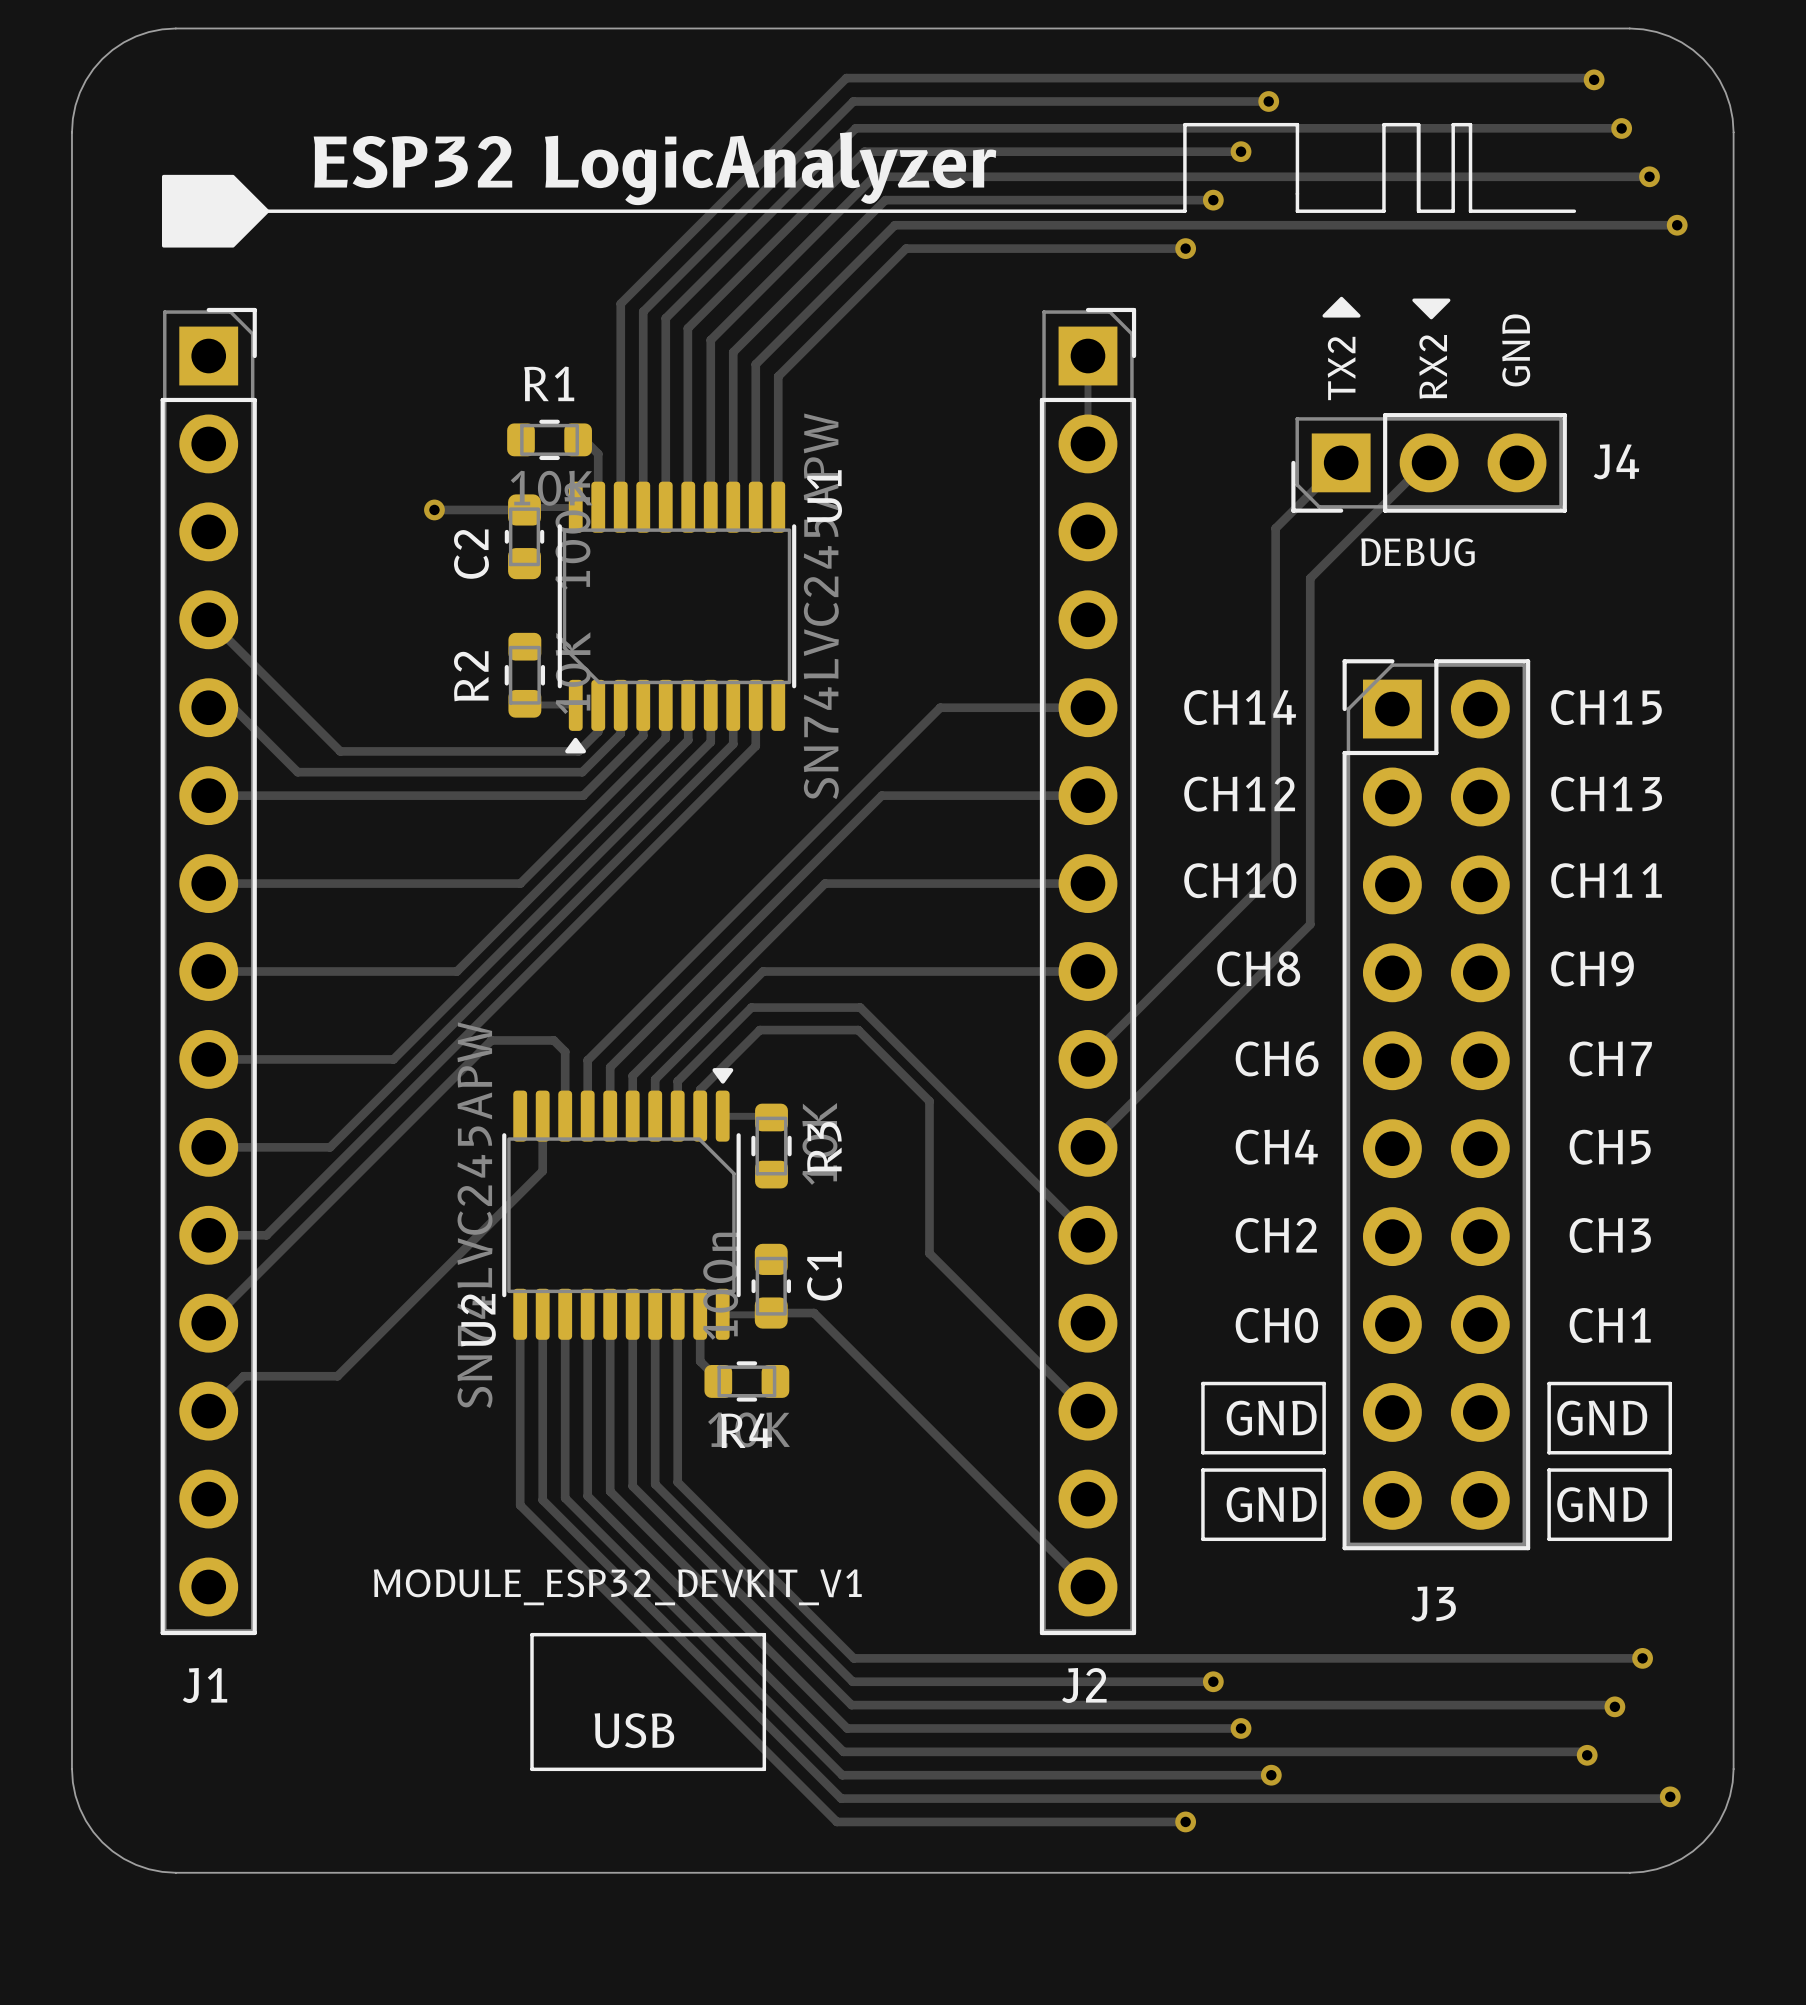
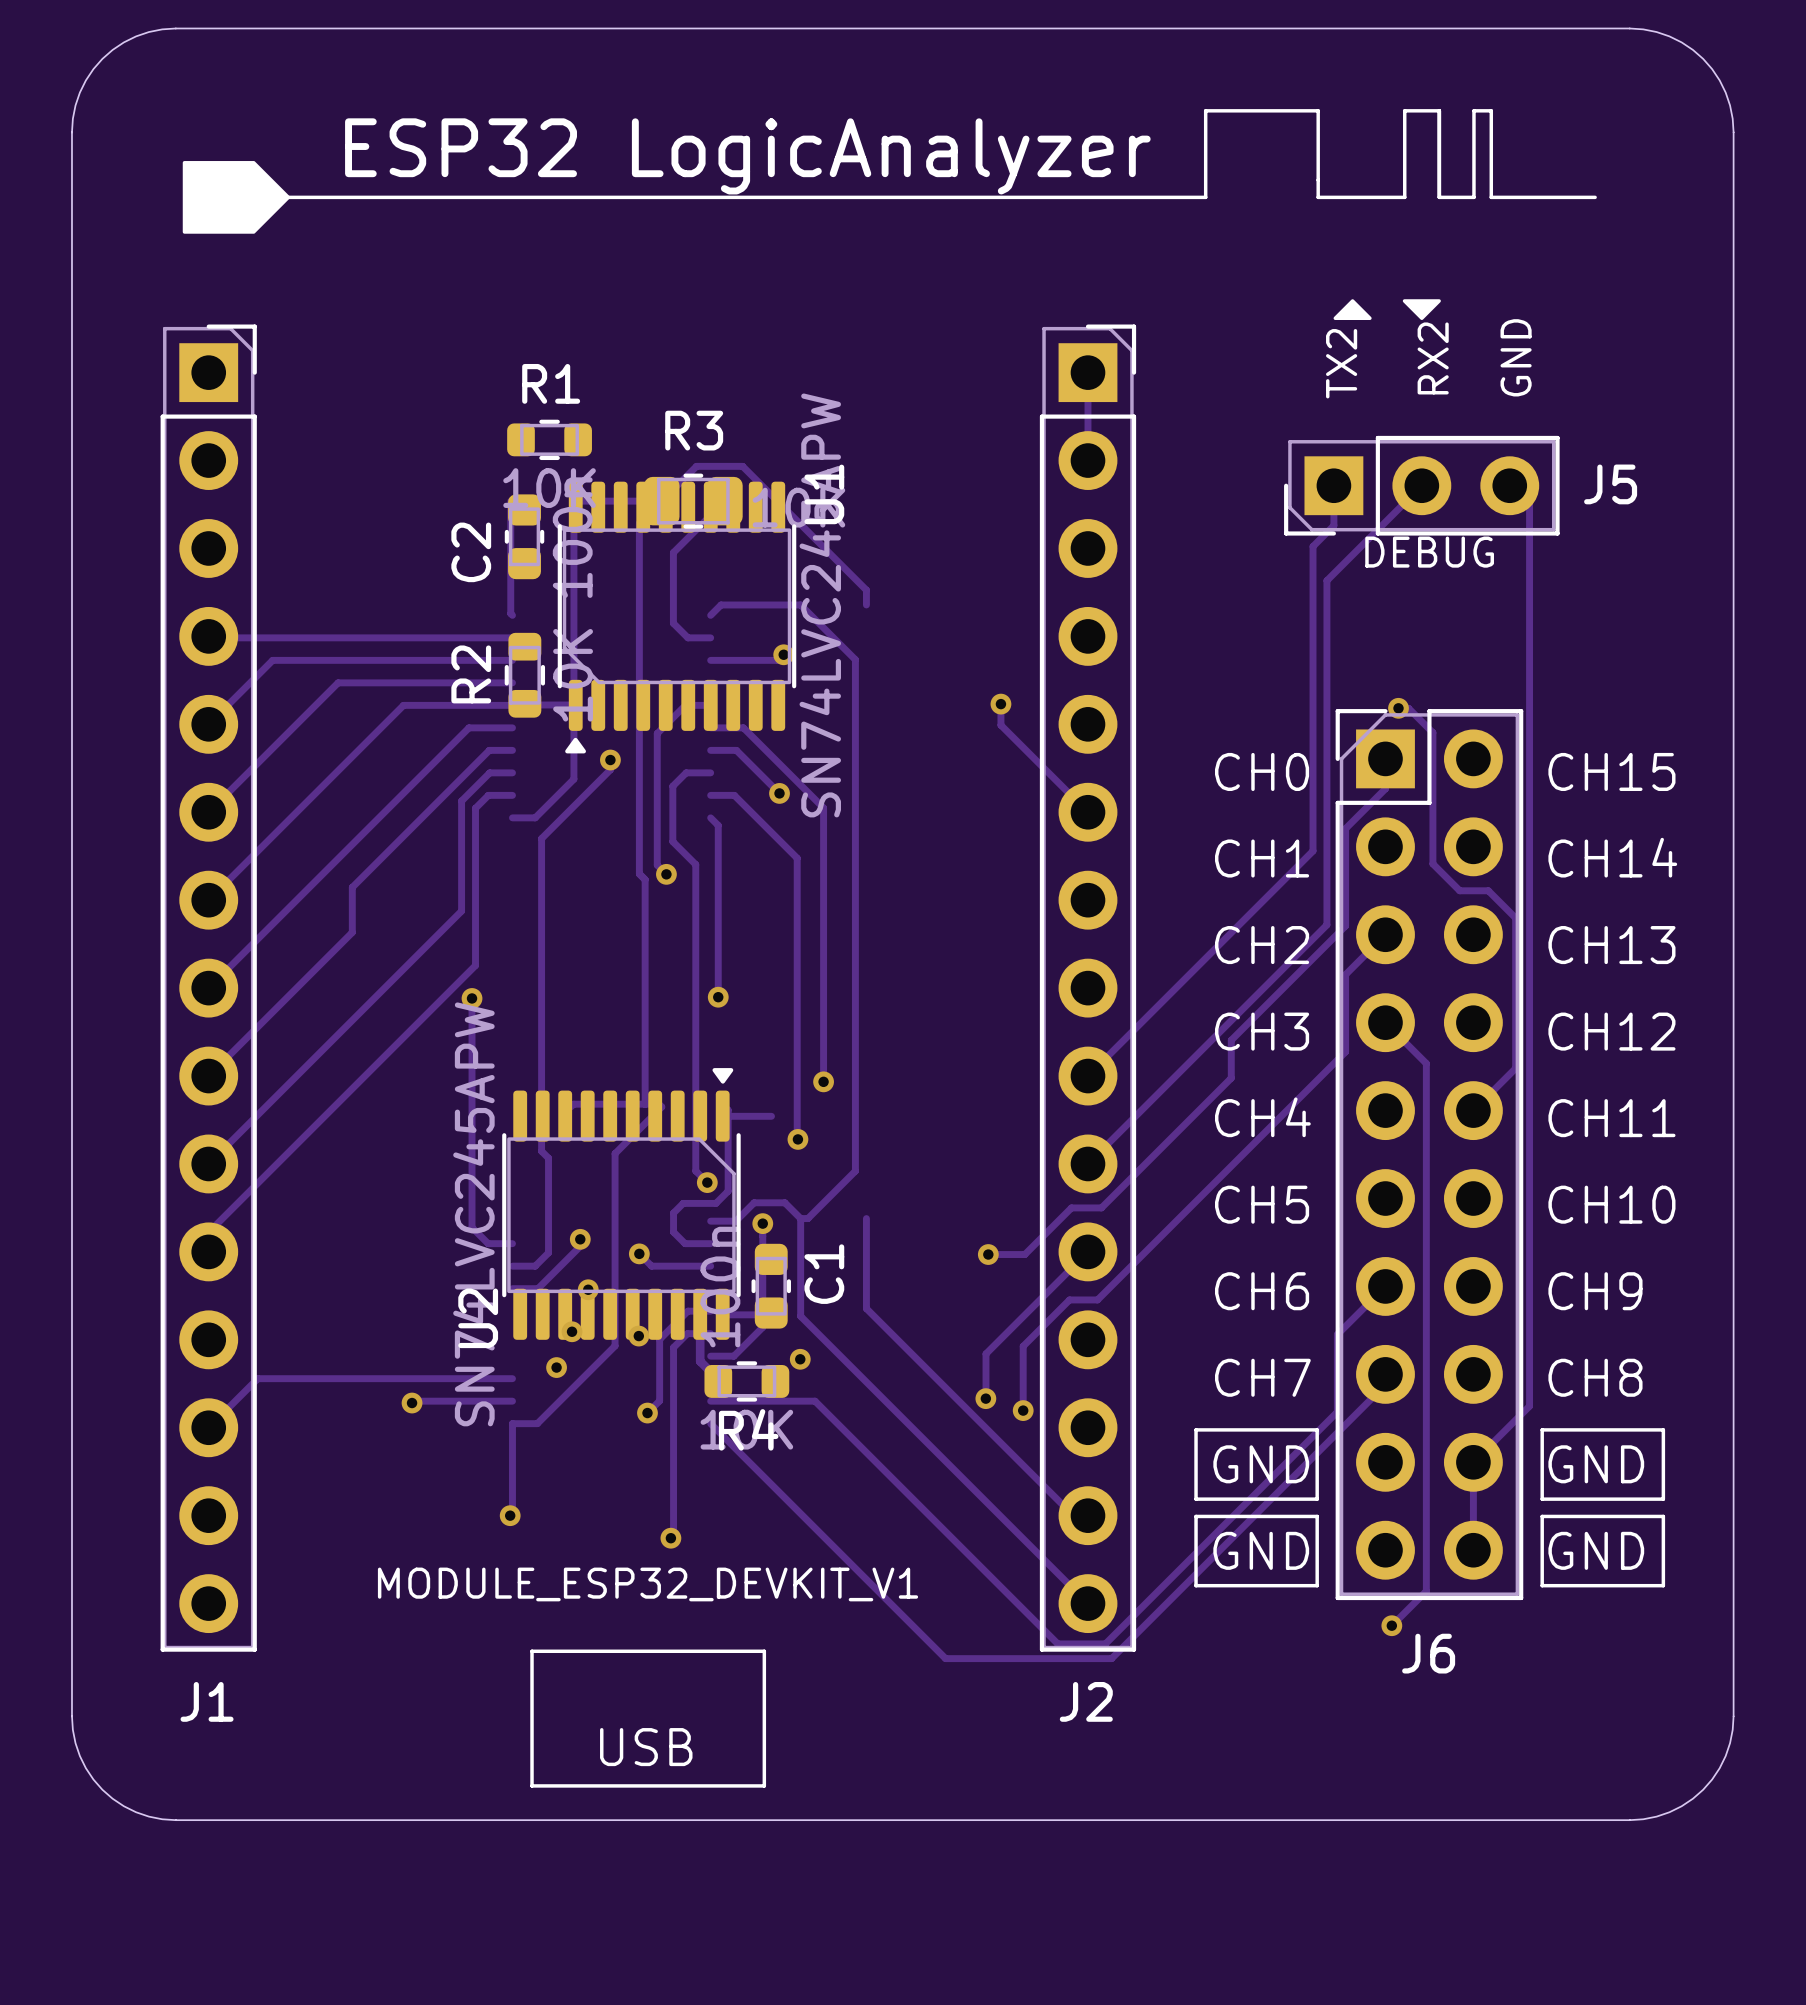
track: (1594, 79) (1592, 78) (846, 78) (620, 303) (620, 507) -> none
via: (1594, 79) -> none
track: (1268, 101) (853, 101) (643, 311) (643, 507) -> none
via: (1268, 101) -> none
track: (1621, 128) (855, 128) (665, 318) (665, 507) -> none
via: (1621, 128) -> none
via: (1241, 151) -> none
track: (1241, 156) (1241, 151) (864, 151) (687, 328) (687, 506) -> none
text position: ESP32 LogicAnalyzer (654, 168) -> ESP32 LogicAnalyzer (747, 156)
track: (1649, 176) (874, 176) (710, 340) (710, 507) -> none
via: (1649, 176) -> none
track: (1212, 200) (885, 200) (733, 352) (733, 507) -> none
via: (1213, 200) -> none
drawing position: (215, 211) -> (236, 197)
line: (267, 211) (1184, 211) (1184, 124) (1297, 124) (1297, 211) (1383, 211) (1383, 124) (1418, 124) (1418, 211) (1453, 211) (1453, 124) (1470, 124) (1470, 211) (1574, 211) -> (288, 197) (1205, 197) (1205, 110) (1318, 110) (1318, 197) (1404, 197) (1404, 110) (1439, 110) (1439, 197) (1473, 197) (1473, 110) (1491, 110) (1491, 197) (1595, 197)
track: (1677, 225) (894, 225) (755, 364) (755, 507) -> none
via: (1677, 225) -> none
track: (1183, 246) (1185, 248) (906, 248) (778, 376) (778, 507) -> none
via: (1185, 248) -> none
drawing shape: [1322, 296, 1361, 318] -> [1333, 299, 1372, 321]
drawing shape: [1412, 298, 1451, 320] -> [1402, 299, 1441, 321]
track: (584, 439) (598, 453) (598, 507) -> none
J4 name: J4 (1616, 461) -> J5 (1610, 484)
track: (1341, 462) (1275, 528) (1275, 871) (1087, 1059) -> none
track: (1429, 462) (1425, 462) (1310, 578) (1310, 924) (1087, 1146) -> none
J4 position: (1429, 462) -> (1421, 485)
track: none -> (1333, 485) (1333, 525) (1313, 546) (1313, 851) (1087, 1076)
track: none -> (1421, 485) (1326, 580) (1326, 924) (1087, 1163)
track: none -> (1509, 485) (1529, 505) (1529, 1406) (1473, 1462) (1473, 1550)
track: none -> (510, 501) (510, 613) (512, 615)
track: none -> (661, 501) (573, 501) (573, 779) (535, 817) (512, 817)
track: none -> (724, 501) (673, 552) (673, 623) (687, 637) (710, 637)
track: (524, 507) (575, 507) -> none
track: (434, 509) (524, 509) -> none
via: (434, 509) -> none
track: none -> (866, 604) (866, 590) (742, 466) (696, 466) (639, 523) (639, 873) (645, 879) (645, 1104)
track: none -> (710, 615) (721, 604) (800, 604) (855, 659) (855, 1171) (807, 1218) (800, 1218)
track: (208, 619) (340, 751) (578, 751) (598, 731) (598, 705) -> none
track: none -> (208, 636) (512, 637)
track: none -> (783, 654) (778, 660) (710, 660)
via: none -> (783, 654)
track: none -> (512, 660) (272, 660) (208, 724)
track: none -> (512, 682) (338, 682) (208, 812)
track: none -> (1000, 704) (1000, 725) (1087, 812)
via: none -> (1000, 704)
track: none -> (512, 705) (403, 705) (208, 900)
track: (620, 705) (620, 733) (582, 772) (297, 772) (233, 707) (208, 707) -> none
track: (643, 705) (643, 735) (583, 795) (208, 795) -> none
track: (665, 705) (665, 738) (520, 883) (208, 883) -> none
track: (688, 705) (688, 740) (456, 971) (208, 971) -> none
track: (710, 705) (710, 742) (393, 1059) (208, 1059) -> (710, 705) (685, 705) (657, 733) (657, 865) (666, 874)
track: (733, 705) (733, 744) (330, 1147) (208, 1147) -> none
track: (755, 705) (755, 746) (266, 1235) (208, 1235) -> none
track: (1087, 707) (940, 707) (587, 1060) (587, 1116) -> none
text position: CH14 (1240, 707) -> CH14 (1612, 857)
text position: CH15 (1606, 707) -> CH15 (1611, 771)
track: none -> (1398, 708) (1408, 708) (1432, 732) (1432, 863) (1459, 890) (1488, 890) (1515, 918) (1515, 1068) (1473, 1110)
via: none -> (1398, 708)
track: none -> (512, 727) (468, 727) (208, 988)
track: none -> (710, 727) (743, 727) (823, 807) (823, 1081)
track: none -> (512, 750) (489, 750) (352, 887) (352, 932) (208, 1076)
track: none -> (710, 750) (736, 750) (779, 793)
track: none -> (1385, 758) (1385, 788) (1345, 828) (1345, 925) (1231, 1040) (1231, 1078) (1101, 1207) (1071, 1207) (1024, 1254) (988, 1254)
track: none -> (610, 760) (610, 769) (541, 838) (541, 1151) (548, 1158) (548, 1252) (535, 1266) (512, 1266)
via: none -> (610, 760)
track: none -> (512, 772) (489, 772) (461, 801) (461, 911) (208, 1163)
track: none -> (710, 772) (686, 772) (672, 786) (672, 841) (695, 864) (695, 1171) (707, 1182)
via: none -> (779, 793)
text position: CH12 (1239, 794) -> CH12 (1611, 1031)
text position: CH13 (1606, 794) -> CH13 (1611, 945)
track: none -> (512, 795) (488, 795) (475, 808) (475, 965) (208, 1232) (208, 1251)
track: none -> (710, 795) (734, 795) (797, 858) (797, 1139)
track: (1087, 795) (881, 795) (610, 1067) (610, 1116) -> none
track: none -> (710, 817) (718, 825) (718, 997)
via: none -> (666, 874)
text position: CH10 (1240, 880) -> CH10 (1611, 1204)
text position: CH11 (1606, 880) -> CH11 (1611, 1118)
track: (1087, 883) (825, 883) (632, 1075) (632, 1116) -> none
track: none -> (1385, 934) (1345, 974) (1345, 1051) (1097, 1299) (1069, 1299) (1023, 1346) (1023, 1410)
text position: CH8 (1258, 968) -> CH8 (1595, 1377)
text position: CH9 (1592, 968) -> CH9 (1595, 1291)
J1 position: (208, 971) -> (208, 988)
track: (1087, 971) (763, 971) (655, 1079) (655, 1116) -> none
J2 position: (1087, 971) -> (1087, 988)
via: none -> (718, 997)
track: none -> (472, 998) (472, 1227) (488, 1243) (512, 1243)
via: none -> (472, 998)
track: none -> (1385, 1022) (1426, 1063) (1426, 1591) (1391, 1625)
text position: CH6 (1277, 1058) -> CH6 (1262, 1291)
text position: CH7 (1610, 1058) -> CH7 (1262, 1377)
via: none -> (823, 1081)
R3 footprint: [751, 1103, 792, 1189] -> [644, 473, 743, 529]
J3: (1436, 1104) -> none
track: none -> (570, 1106) (573, 1104) (659, 1104) (661, 1106) (615, 1153) (615, 1345) (537, 1423) (512, 1423) (512, 1513) (510, 1515)
track: none -> (724, 1106) (728, 1110) (728, 1191) (715, 1203) (683, 1203) (673, 1213) (673, 1232) (685, 1243) (710, 1243)
track: (542, 1116) (542, 1171) (337, 1376) (243, 1376) (208, 1411) -> none
track: (565, 1116) (565, 1051) (553, 1040) (491, 1040) (208, 1323) -> none
track: (677, 1116) (677, 1081) (751, 1007) (860, 1007) (1087, 1235) -> none
track: (700, 1116) (700, 1089) (759, 1030) (858, 1030) (929, 1101) (929, 1253) (1087, 1411) -> none
via: none -> (797, 1139)
R3 name position: R3 (824, 1147) -> R3 (694, 430)
text position: CH4 (1276, 1147) -> CH4 (1262, 1117)
text position: CH5 (1610, 1147) -> CH5 (1262, 1204)
J6: none -> (1429, 1154)
via: none -> (707, 1182)
track: none -> (800, 1218) (784, 1202) (754, 1202) (735, 1221) (710, 1221)
track: none -> (800, 1218) (800, 1316) (1087, 1603)
track: none -> (866, 1218) (866, 1308) (1073, 1515) (1087, 1515)
track: none -> (762, 1223) (762, 1327) (733, 1356) (710, 1356)
via: none -> (762, 1223)
text position: CH2 (1276, 1235) -> CH2 (1262, 945)
text position: CH3 (1610, 1235) -> CH3 (1262, 1031)
track: none -> (580, 1239) (580, 1246) (537, 1288) (512, 1288)
via: none -> (580, 1239)
track: none -> (1087, 1251) (986, 1353) (986, 1398)
track: none -> (639, 1253) (651, 1266) (710, 1266)
via: none -> (639, 1253)
via: none -> (988, 1254)
track: none -> (1385, 1286) (1337, 1334) (1337, 1412) (1105, 1643) (1057, 1643) (815, 1401) (710, 1401)
via: none -> (588, 1289)
track: none -> (710, 1311) (687, 1311) (659, 1339) (659, 1400) (647, 1413)
track: (771, 1313) (814, 1313) (1087, 1586) -> none
track: (520, 1314) (520, 1505) (836, 1821) (1185, 1821) -> none
track: (542, 1314) (542, 1500) (841, 1798) (1668, 1798) (1670, 1796) -> none
track: (565, 1314) (565, 1498) (842, 1775) (1271, 1775) -> none
track: (587, 1314) (587, 1496) (843, 1751) (1583, 1751) (1587, 1755) -> none
track: (610, 1314) (610, 1491) (847, 1728) (1241, 1728) -> none
track: (632, 1314) (632, 1486) (851, 1705) (1610, 1705) (1614, 1706) -> none
track: (655, 1314) (655, 1484) (852, 1681) (1213, 1681) -> none
track: (677, 1314) (677, 1482) (853, 1658) (1642, 1658) -> none
text position: CH0 (1276, 1325) -> CH0 (1262, 771)
text position: CH1 (1610, 1325) -> CH1 (1262, 858)
via: none -> (572, 1331)
track: none -> (710, 1333) (687, 1333) (673, 1347) (673, 1535) (670, 1538)
via: none -> (638, 1336)
via: none -> (800, 1359)
via: none -> (556, 1367)
track: none -> (1385, 1374) (1385, 1384) (1111, 1658) (945, 1658) (710, 1423)
track: none -> (512, 1378) (257, 1378) (208, 1427)
line: (1202, 1383) (1324, 1383) (1324, 1452) (1202, 1452) (1202, 1383) -> (1196, 1429) (1317, 1429) (1317, 1499) (1196, 1499) (1196, 1429)
line: (1549, 1383) (1670, 1383) (1670, 1452) (1549, 1452) (1549, 1383) -> (1542, 1429) (1663, 1429) (1663, 1499) (1542, 1499) (1542, 1429)
via: none -> (985, 1398)
track: none -> (512, 1401) (413, 1401) (412, 1403)
via: none -> (412, 1403)
via: none -> (1023, 1410)
via: none -> (647, 1413)
text: GND (1271, 1418) -> none
text: GND (1602, 1418) -> none
text: none -> GND (1261, 1464)
text: none -> GND (1596, 1464)
line: (1202, 1470) (1202, 1539) (1324, 1539) (1324, 1470) (1202, 1470) -> (1196, 1516) (1196, 1585) (1317, 1585) (1317, 1516) (1196, 1516)
line: (1549, 1470) (1670, 1470) (1670, 1539) (1549, 1539) (1549, 1470) -> (1542, 1516) (1663, 1516) (1663, 1585) (1542, 1585) (1542, 1516)
text: GND (1271, 1504) -> none
text: GND (1602, 1504) -> none
via: none -> (510, 1515)
via: none -> (670, 1538)
text: none -> GND (1261, 1550)
text: none -> GND (1596, 1550)
via: none -> (1391, 1625)
line: (532, 1651) (532, 1634) (764, 1634) (764, 1651) -> (532, 1651) (764, 1651)
via: (1642, 1658) -> none
via: (1213, 1681) -> none
via: (1614, 1706) -> none
board edge: (71, 1716) (72, 1782) (75, 1795) (85, 1820) (102, 1842) (123, 1858) (148, 1869) (175, 1872) (1643, 1871) (1669, 1864) (1692, 1851) (1703, 1842) (1719, 1820) (1725, 1808) (1730, 1795) (1733, 1768) -> (71, 1716) (72, 1729) (79, 1756) (93, 1779) (102, 1789) (112, 1798) (136, 1812) (148, 1816) (175, 1820) (1643, 1819) (1669, 1812) (1692, 1798) (1703, 1789) (1719, 1768) (1725, 1756) (1730, 1743) (1733, 1716)
board edge: (1733, 1716) (1733, 1769) -> none
via: (1241, 1728) -> none
text position: USB (634, 1730) -> USB (646, 1747)
via: (1587, 1755) -> none
line: (532, 1769) (764, 1769) -> (532, 1769) (532, 1785) (764, 1785) (764, 1769)
via: (1271, 1775) -> none
via: (1670, 1796) -> none
via: (1185, 1821) -> none

